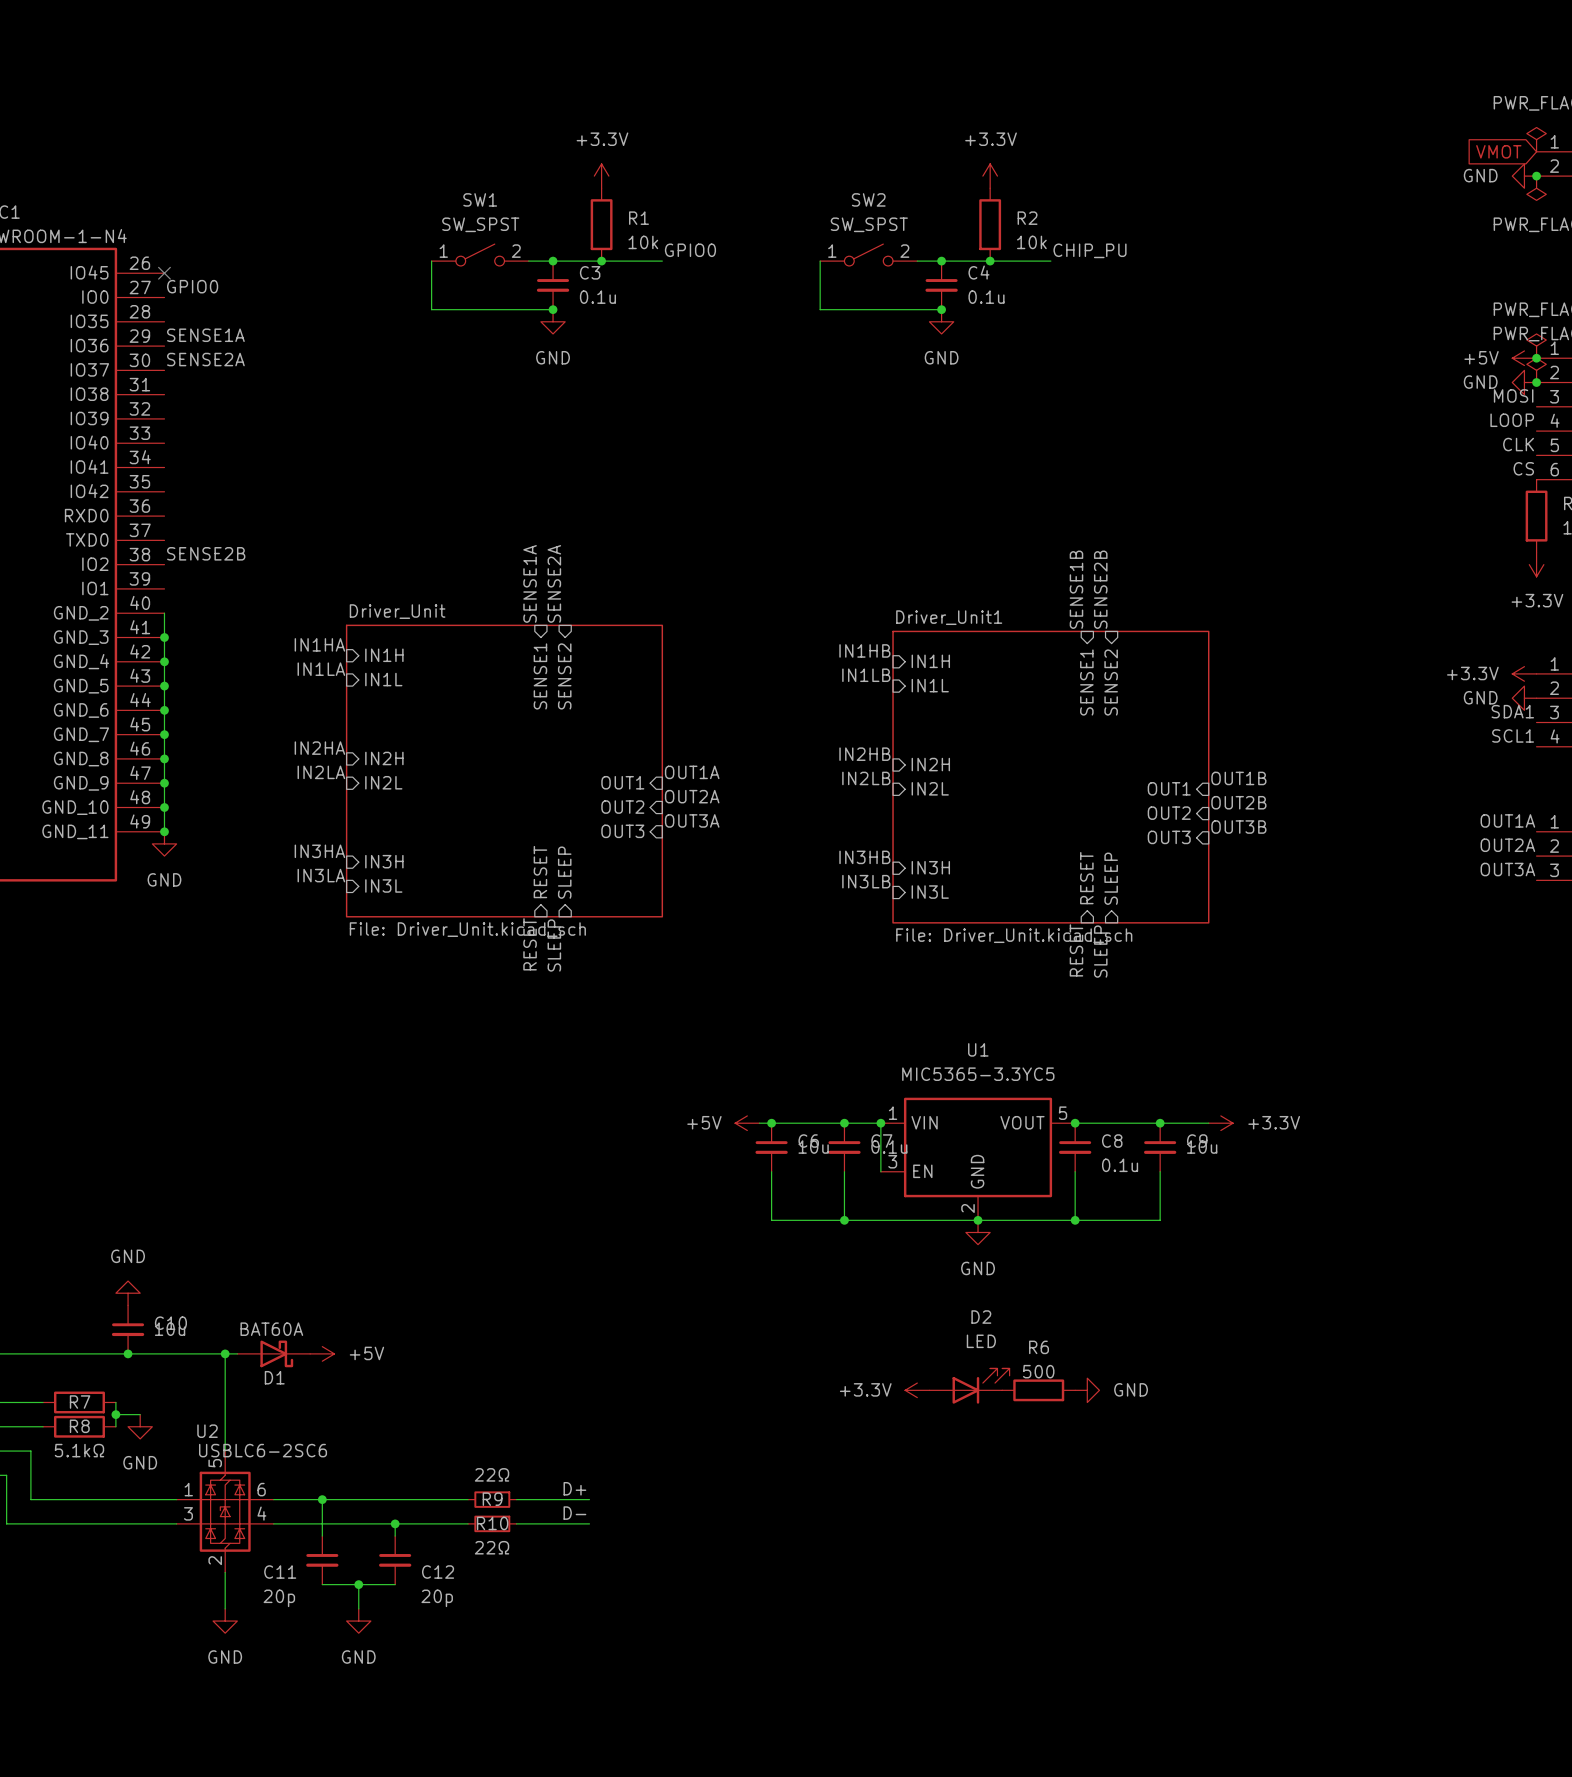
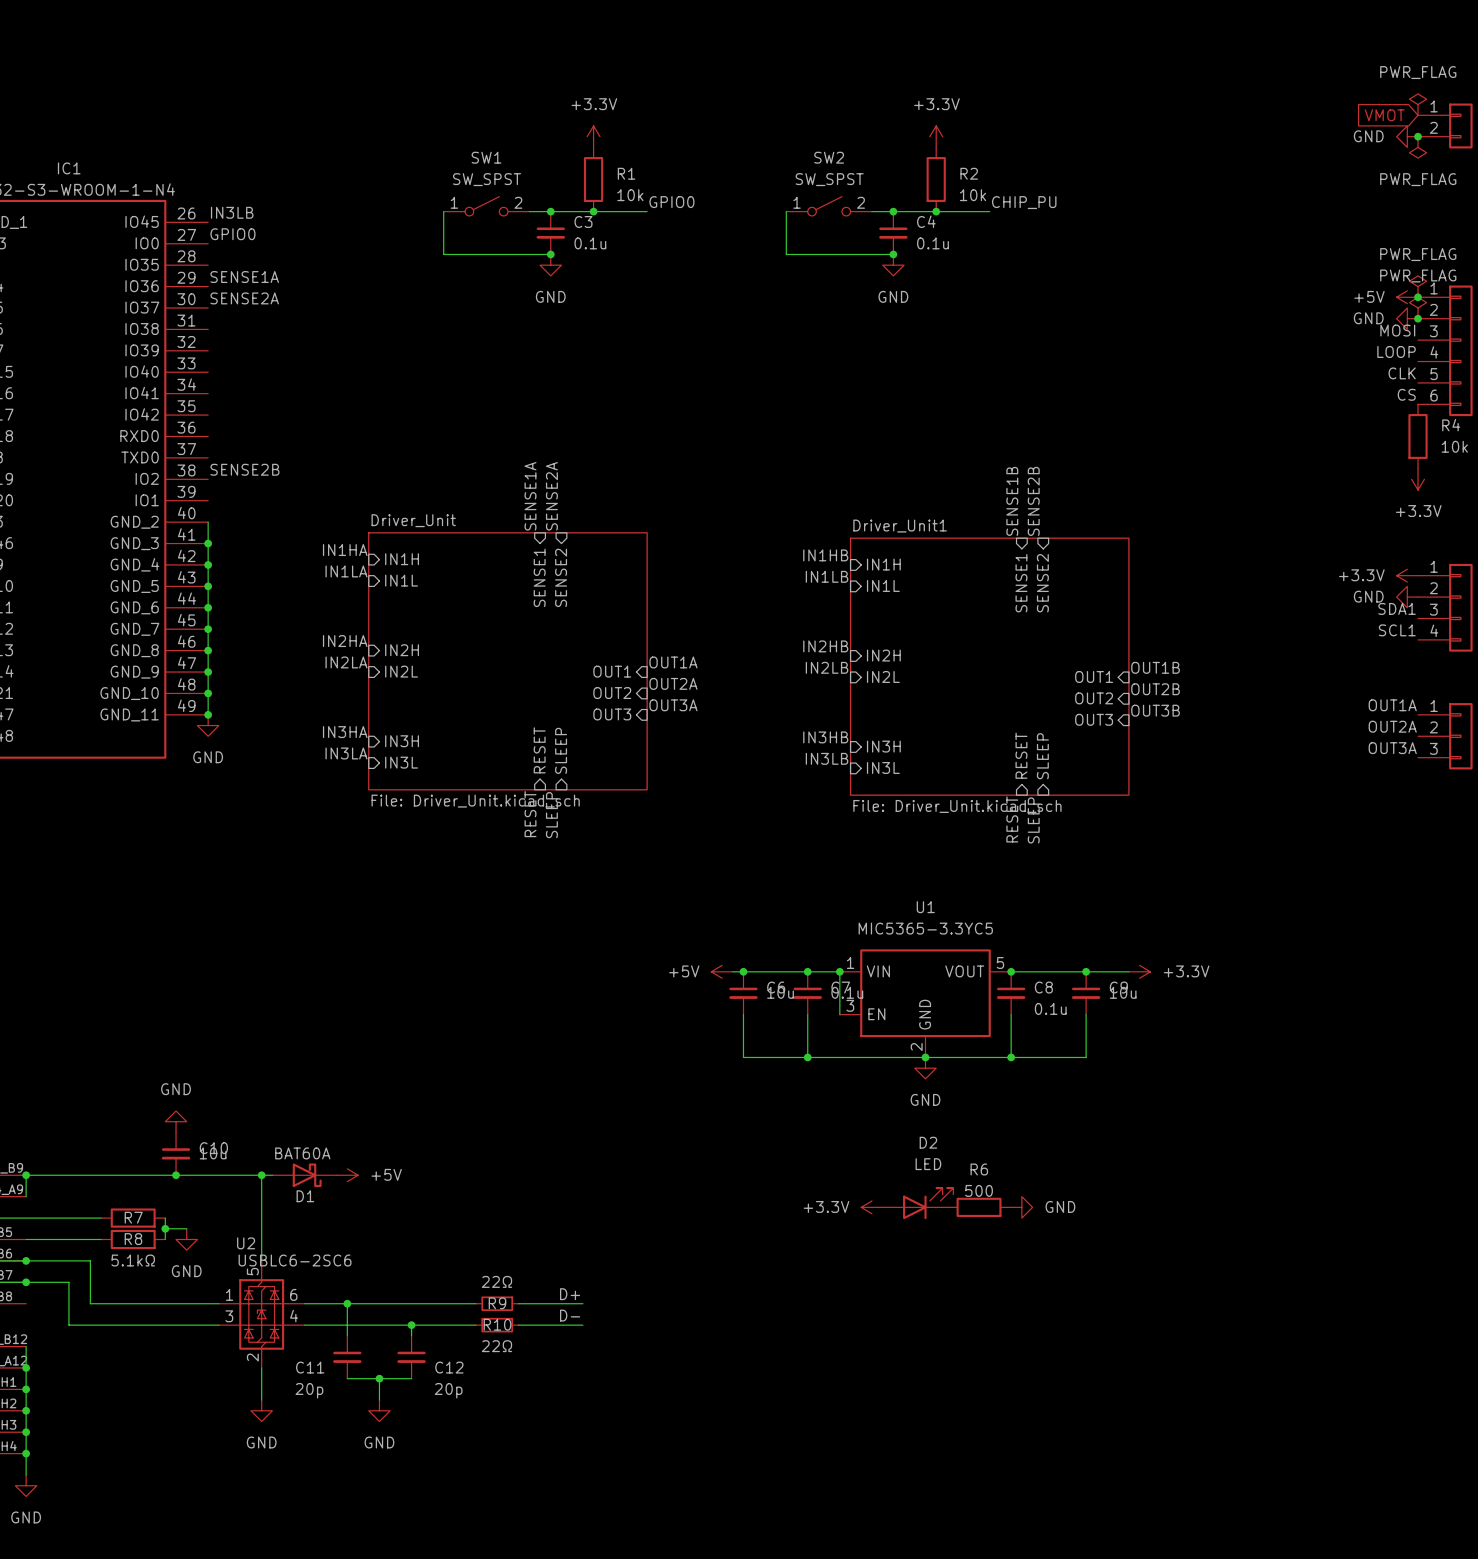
label: none -> IN3LB (232, 212)
no-connect mark: (164, 273) -> none

